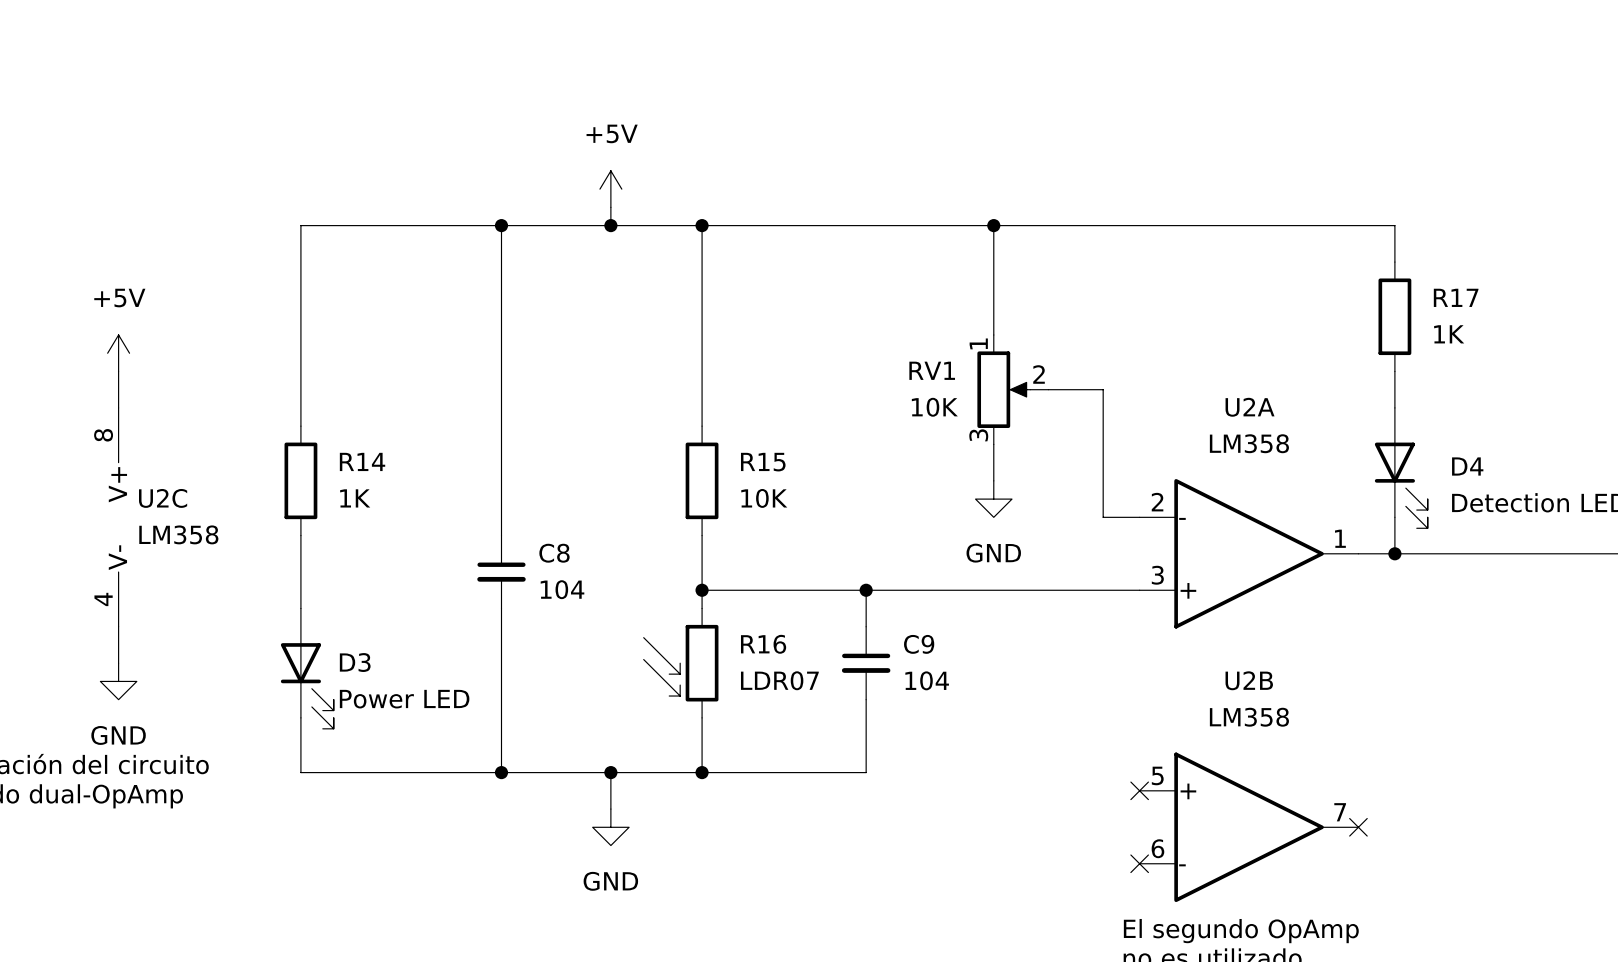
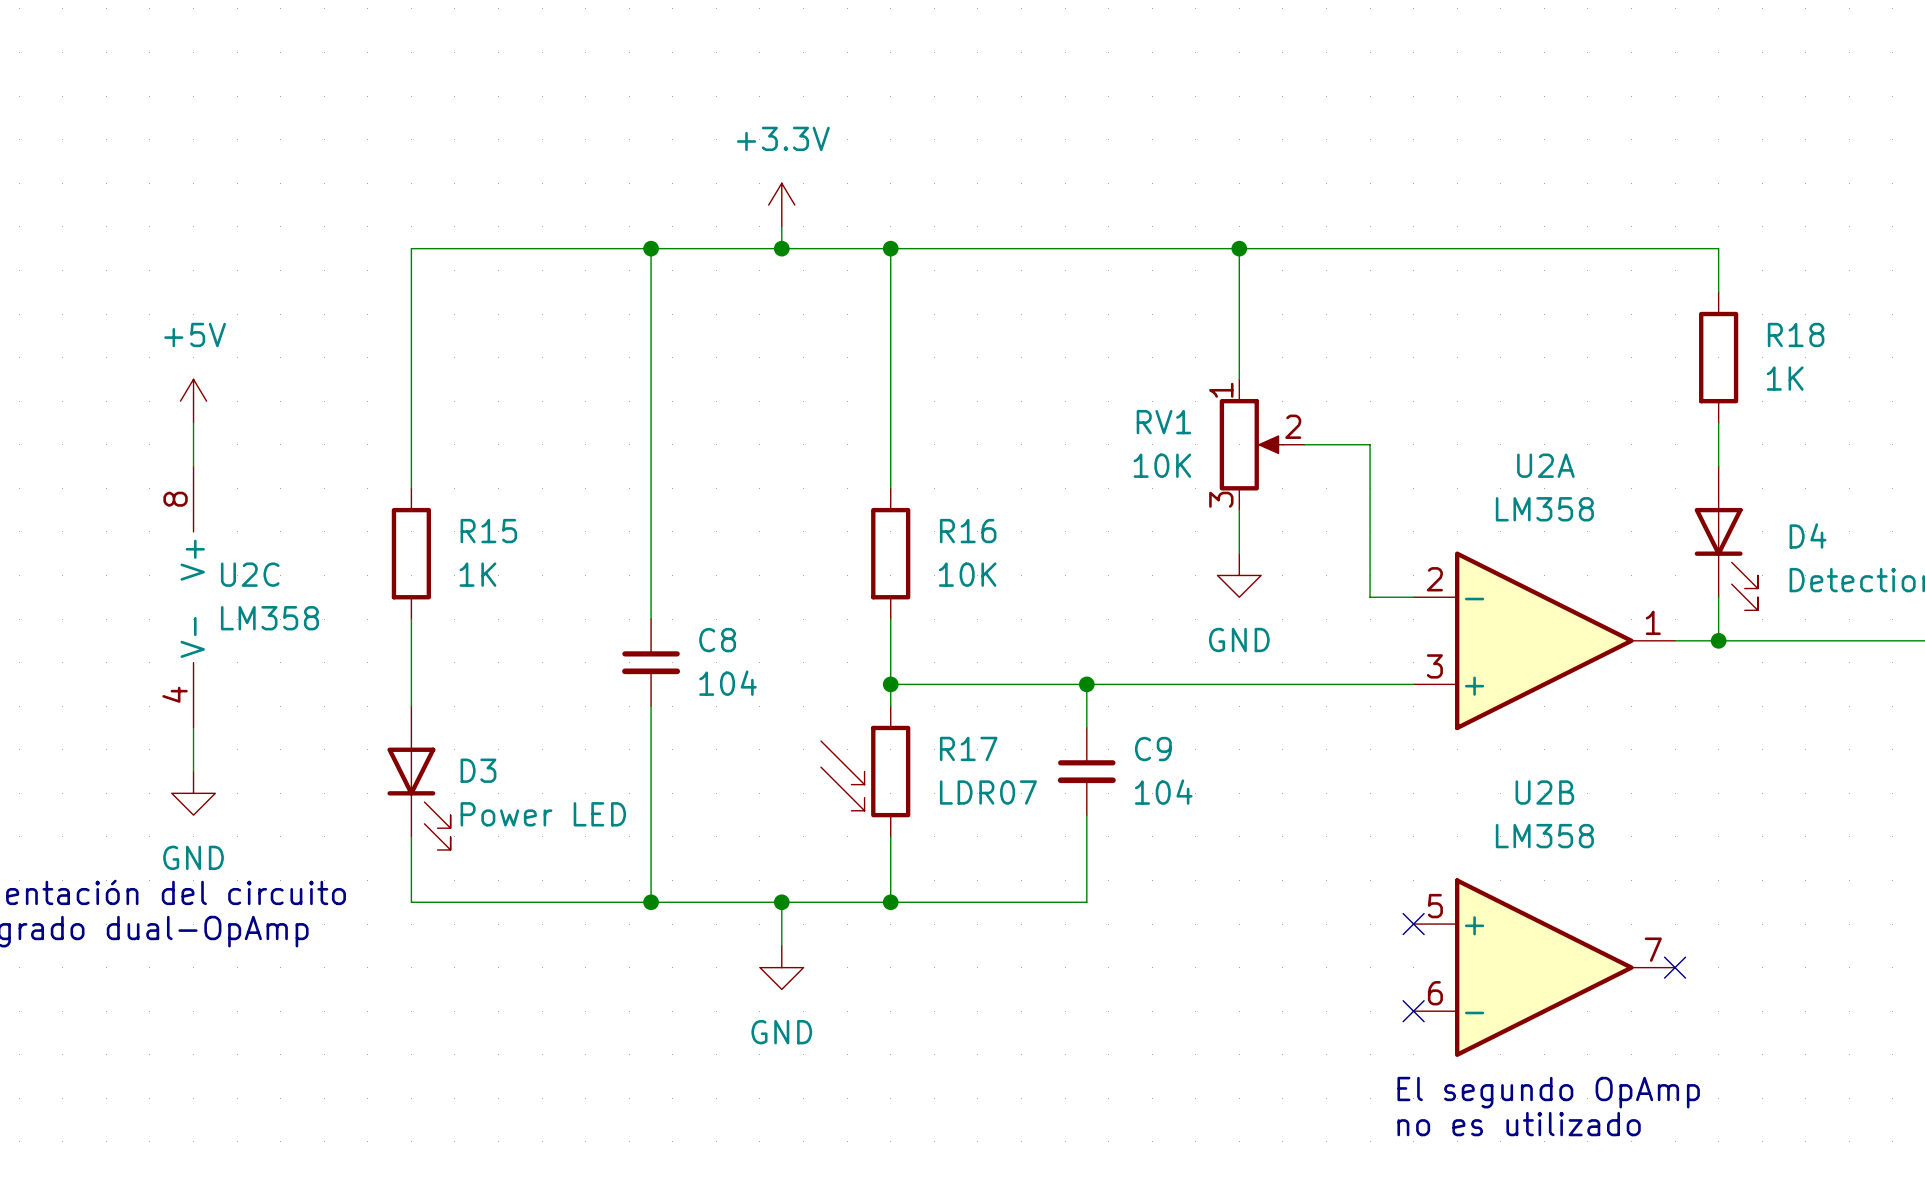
power symbol: +5V (610, 189) -> +3.3V (781, 205)
R17 name: R17 (1456, 297) -> R18 (1796, 334)
R14 name: R14 (362, 461) -> R15 (488, 531)
R15 name: R15 (763, 462) -> R16 (968, 531)
R16 name: R16 (763, 644) -> R17 (968, 748)

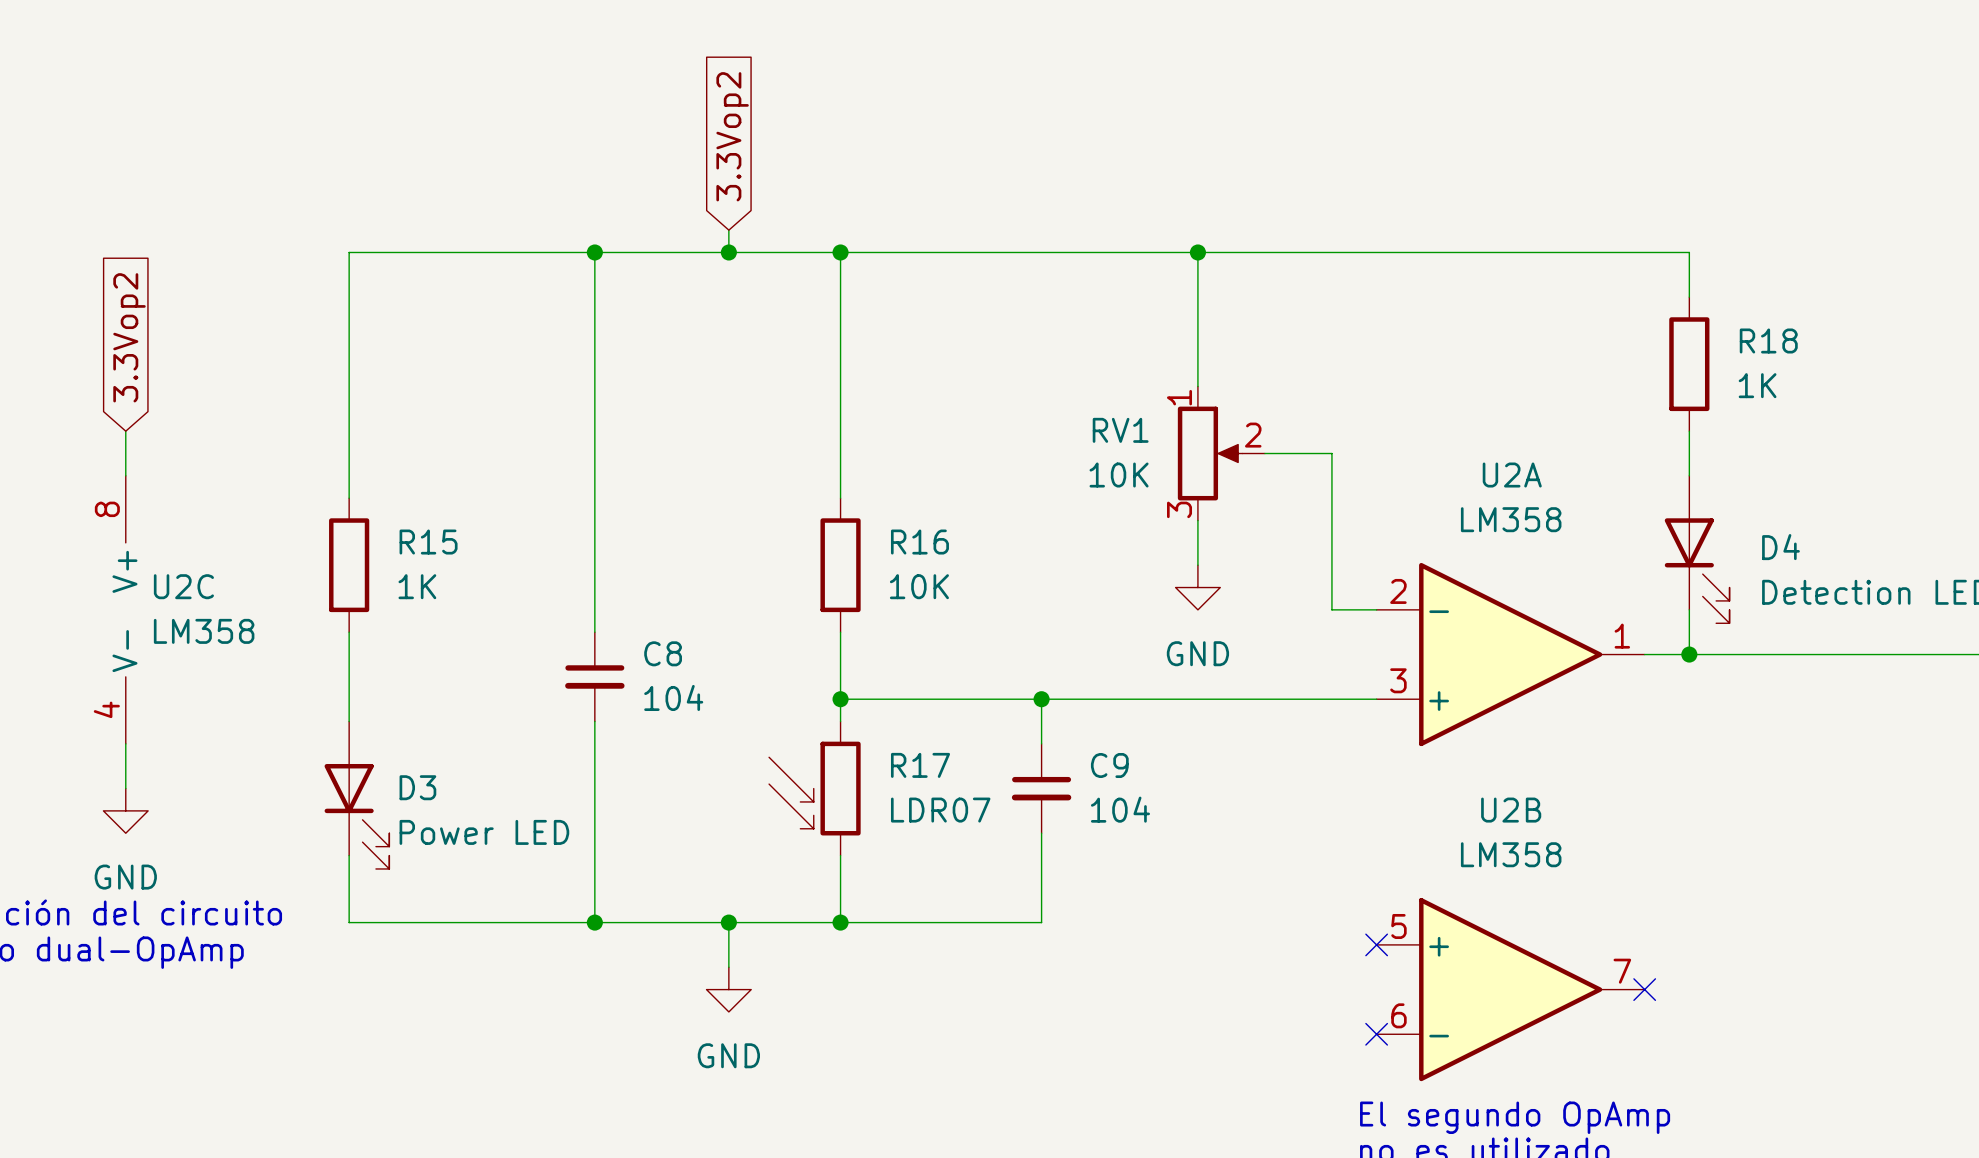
global label: none -> 3.3Vop2 (732, 136)
power symbol: +3.3V (781, 205) -> none
global label: none -> 3.3Vop2 (129, 337)
power symbol: +5V (193, 401) -> none

